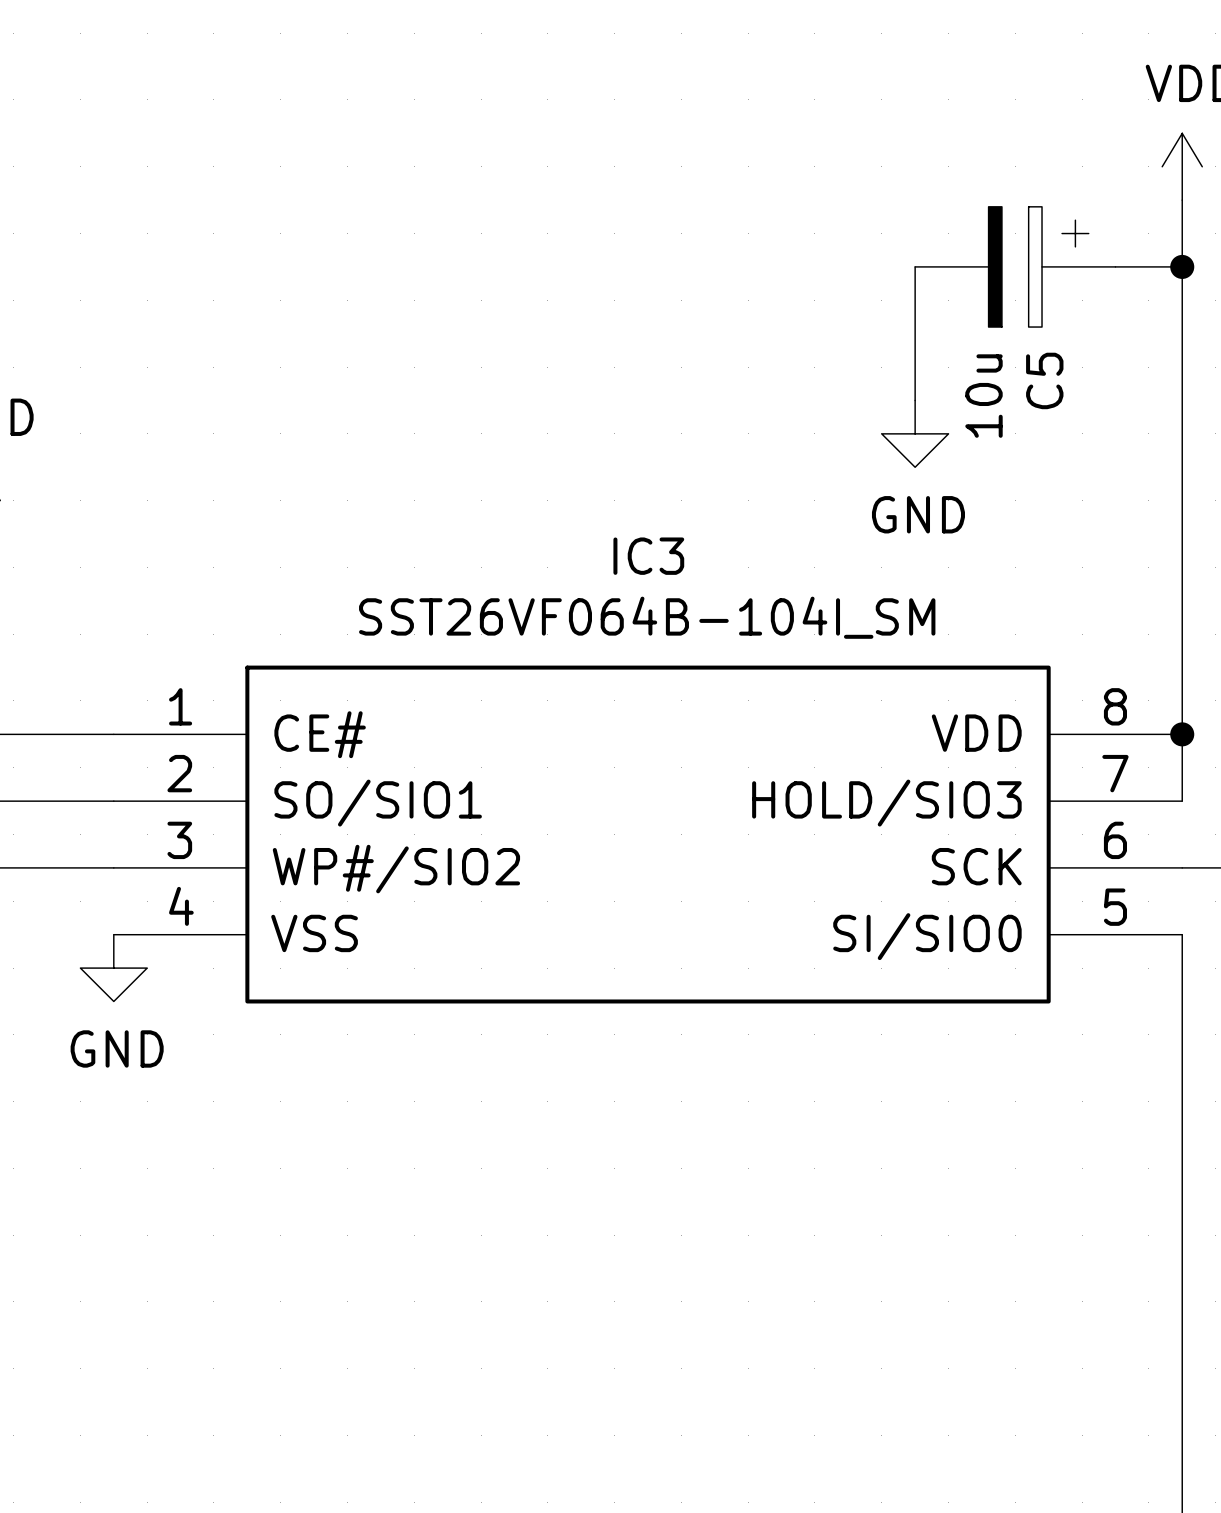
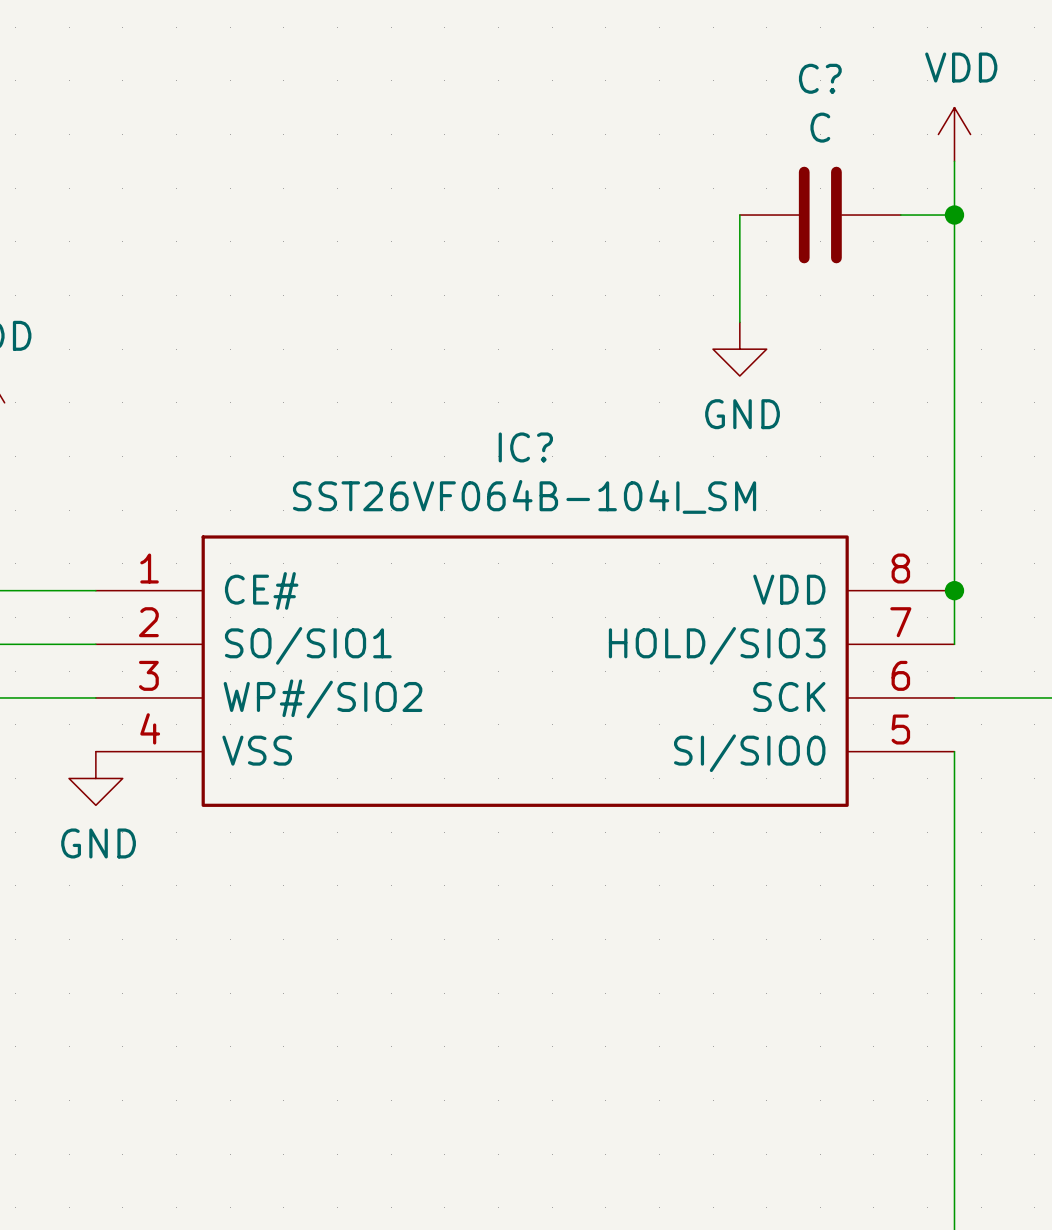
C5: 10u (1015, 266) -> none
C?: none -> C (820, 215)
IC3 name: IC3 (648, 556) -> IC? (525, 447)

